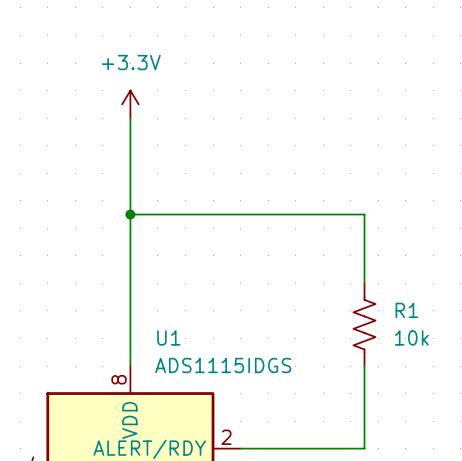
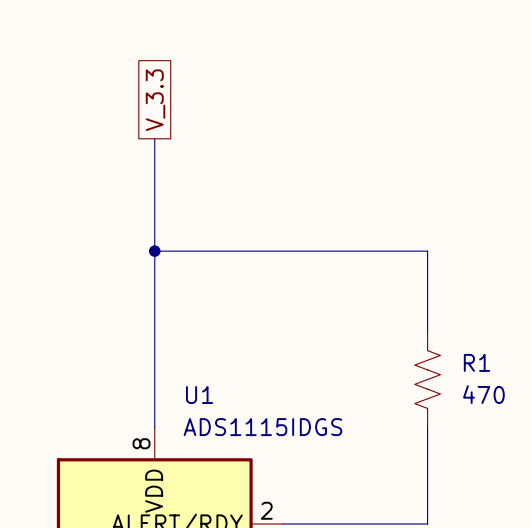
global label: none -> V_3.3 (155, 100)
power symbol: +3.3V (130, 104) -> none
R1 value: 10k (411, 337) -> 470 (483, 394)

